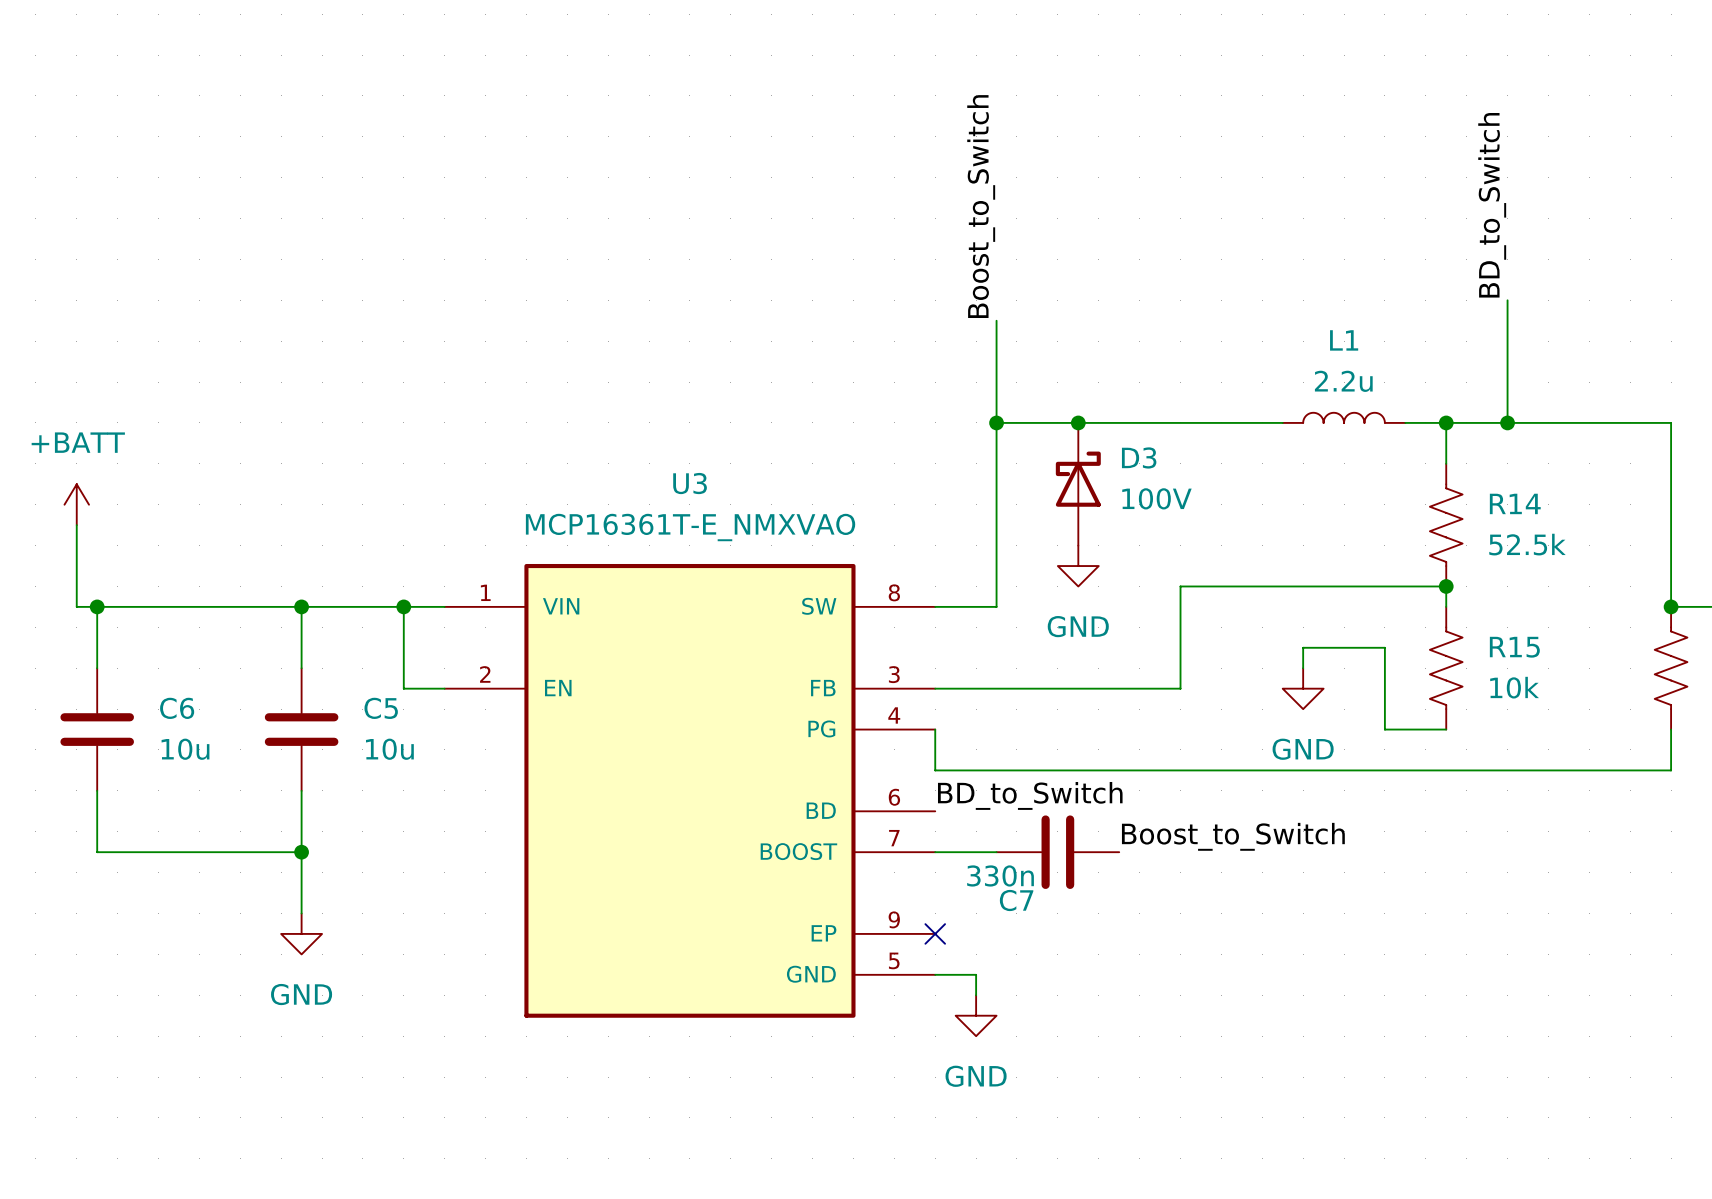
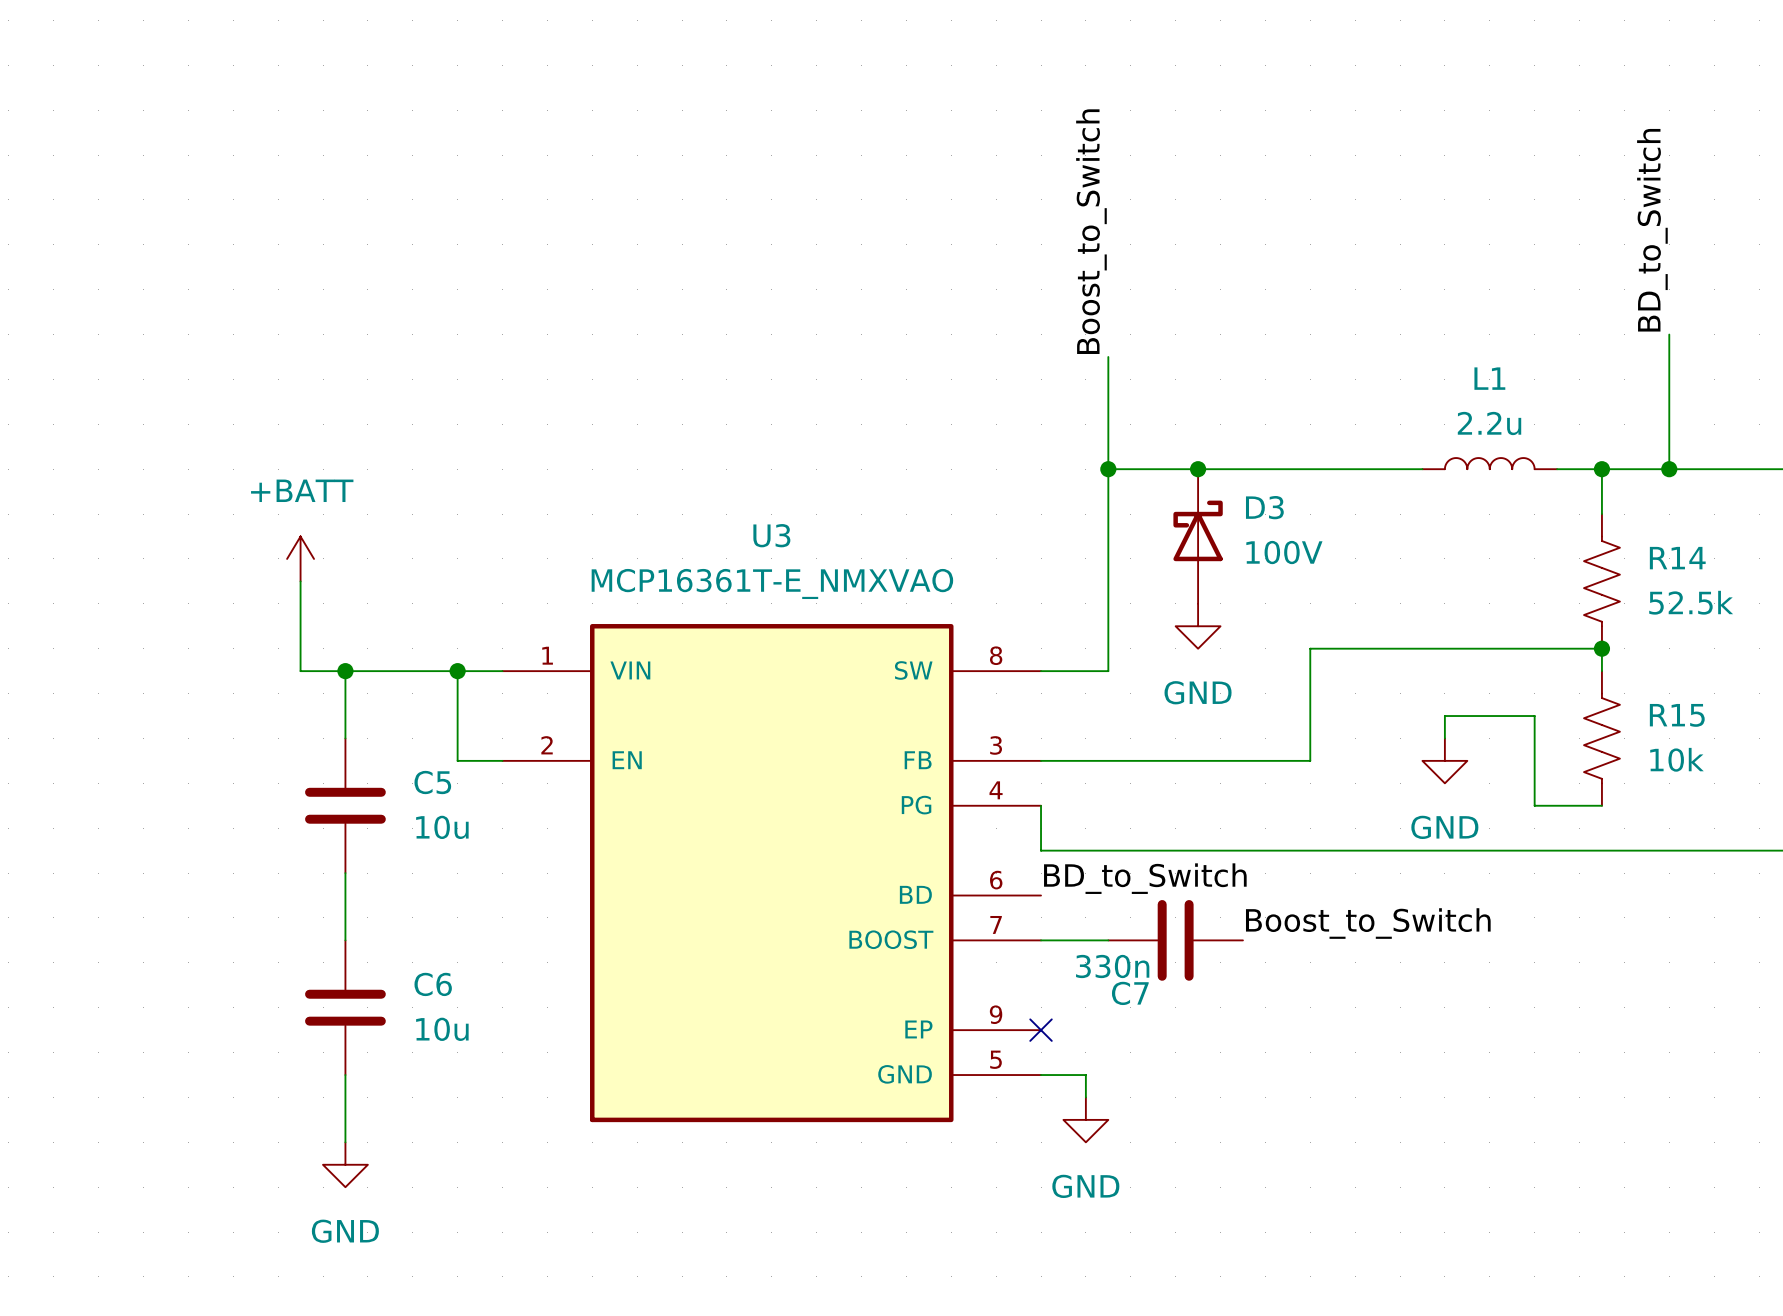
power symbol position: +BATT (76, 504) -> +BATT (300, 558)
wire: (76, 525) (76, 606) (260, 606) -> (300, 581) (300, 671)
wire: (97, 606) (97, 668) -> none
junction: (97, 606) -> none
C6 position: (97, 729) -> (345, 1007)
wire: (97, 790) (97, 852) (301, 852) (301, 913) -> none
junction: (301, 852) -> none
power symbol position: GND (301, 933) -> GND (345, 1164)
wire: none -> (345, 1075) (345, 1142)

